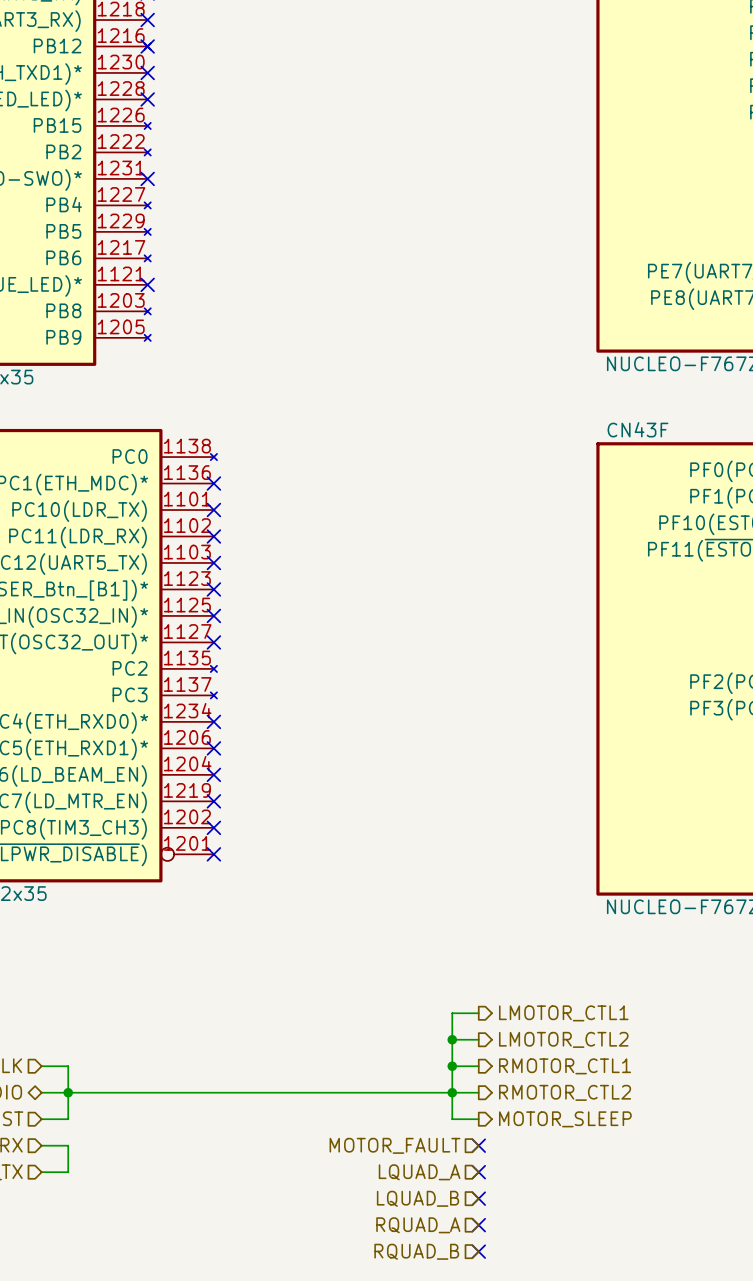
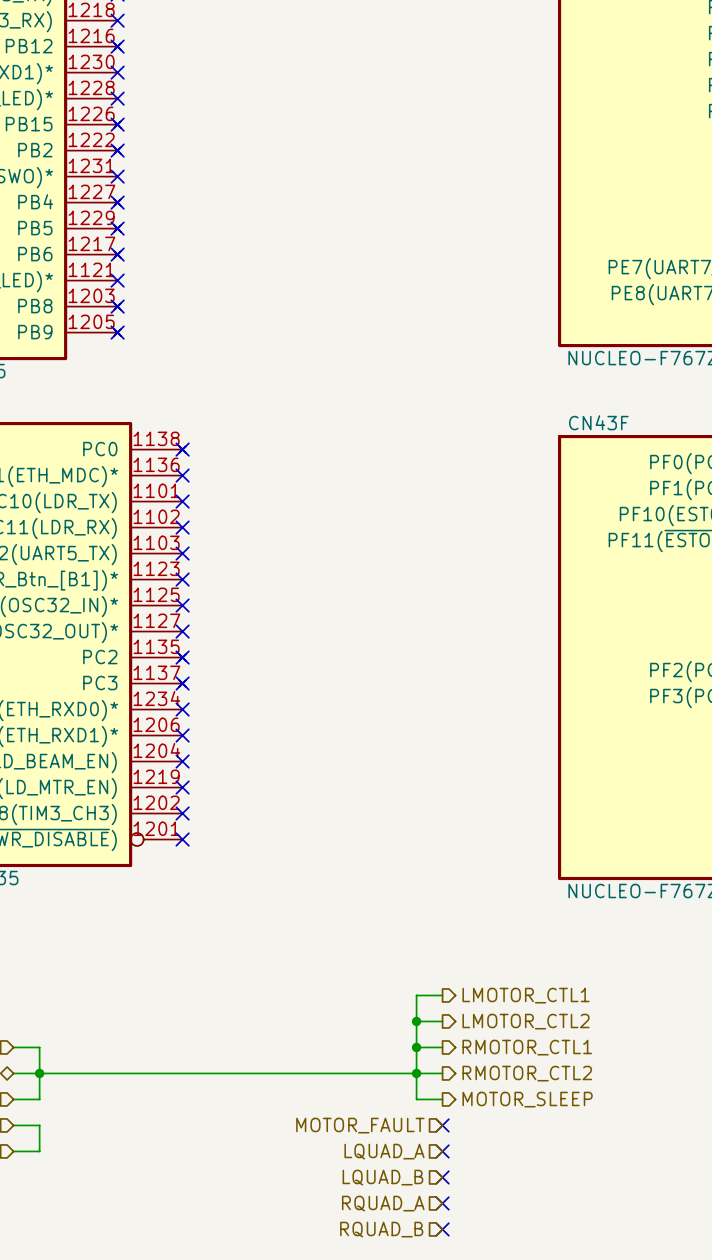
no-connect mark: none -> (117, 124)
no-connect mark: none -> (117, 150)
no-connect mark: none -> (117, 202)
no-connect mark: none -> (117, 228)
no-connect mark: none -> (117, 254)
no-connect mark: none -> (117, 306)
no-connect mark: none -> (117, 332)
no-connect mark: none -> (182, 449)
no-connect mark: none -> (182, 657)
no-connect mark: none -> (182, 683)

